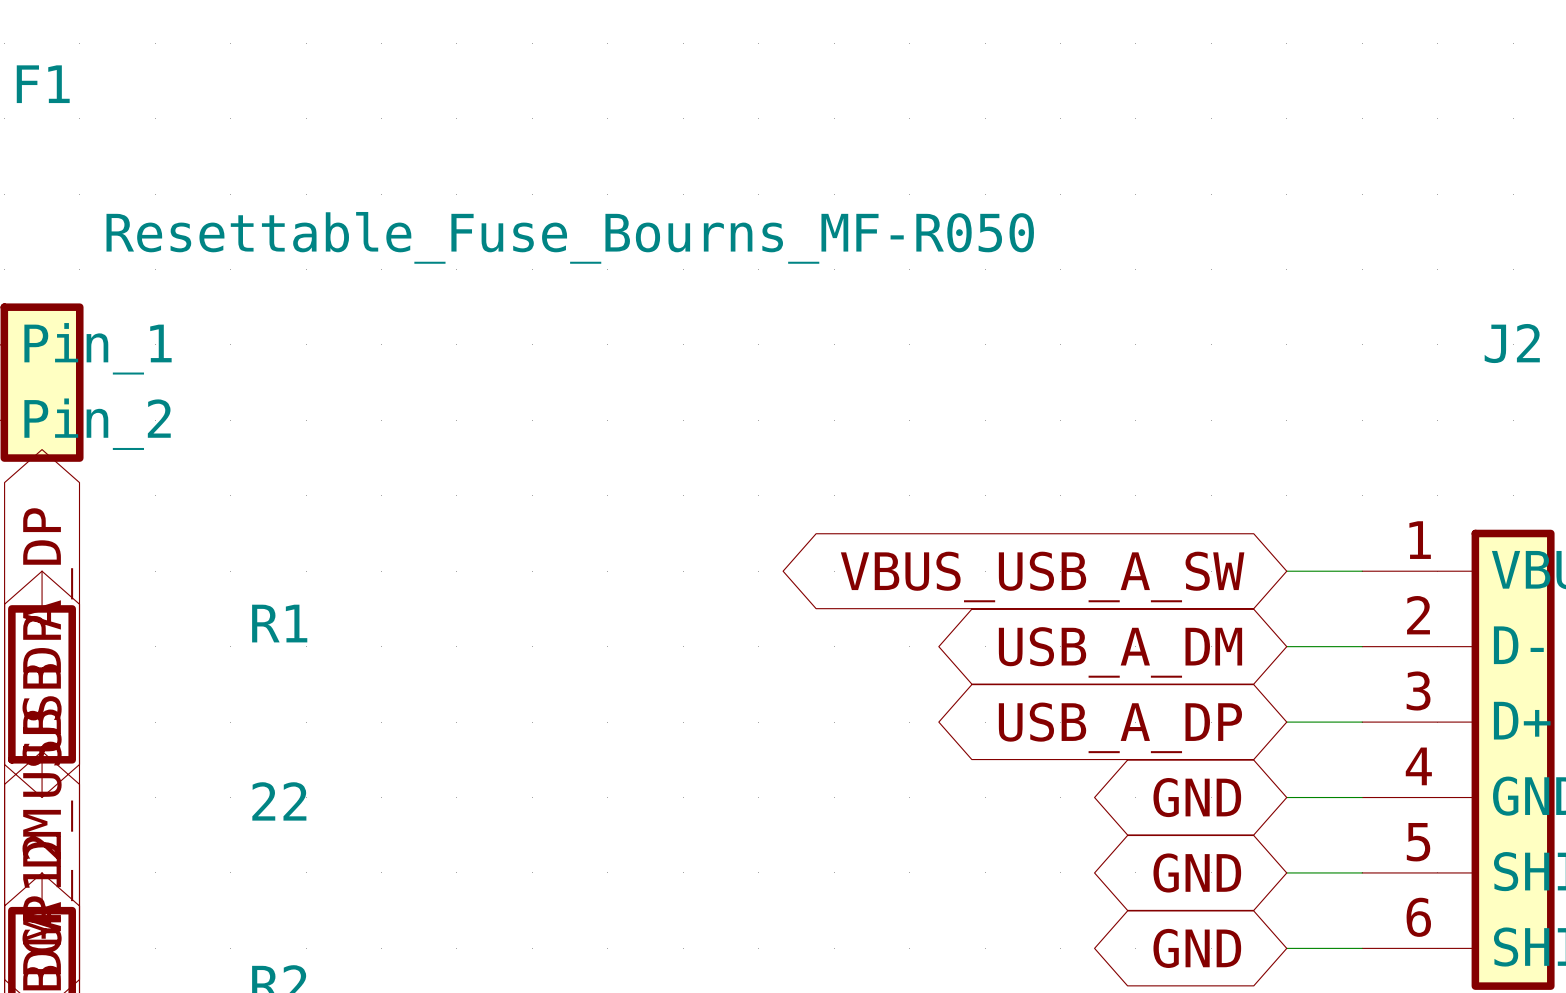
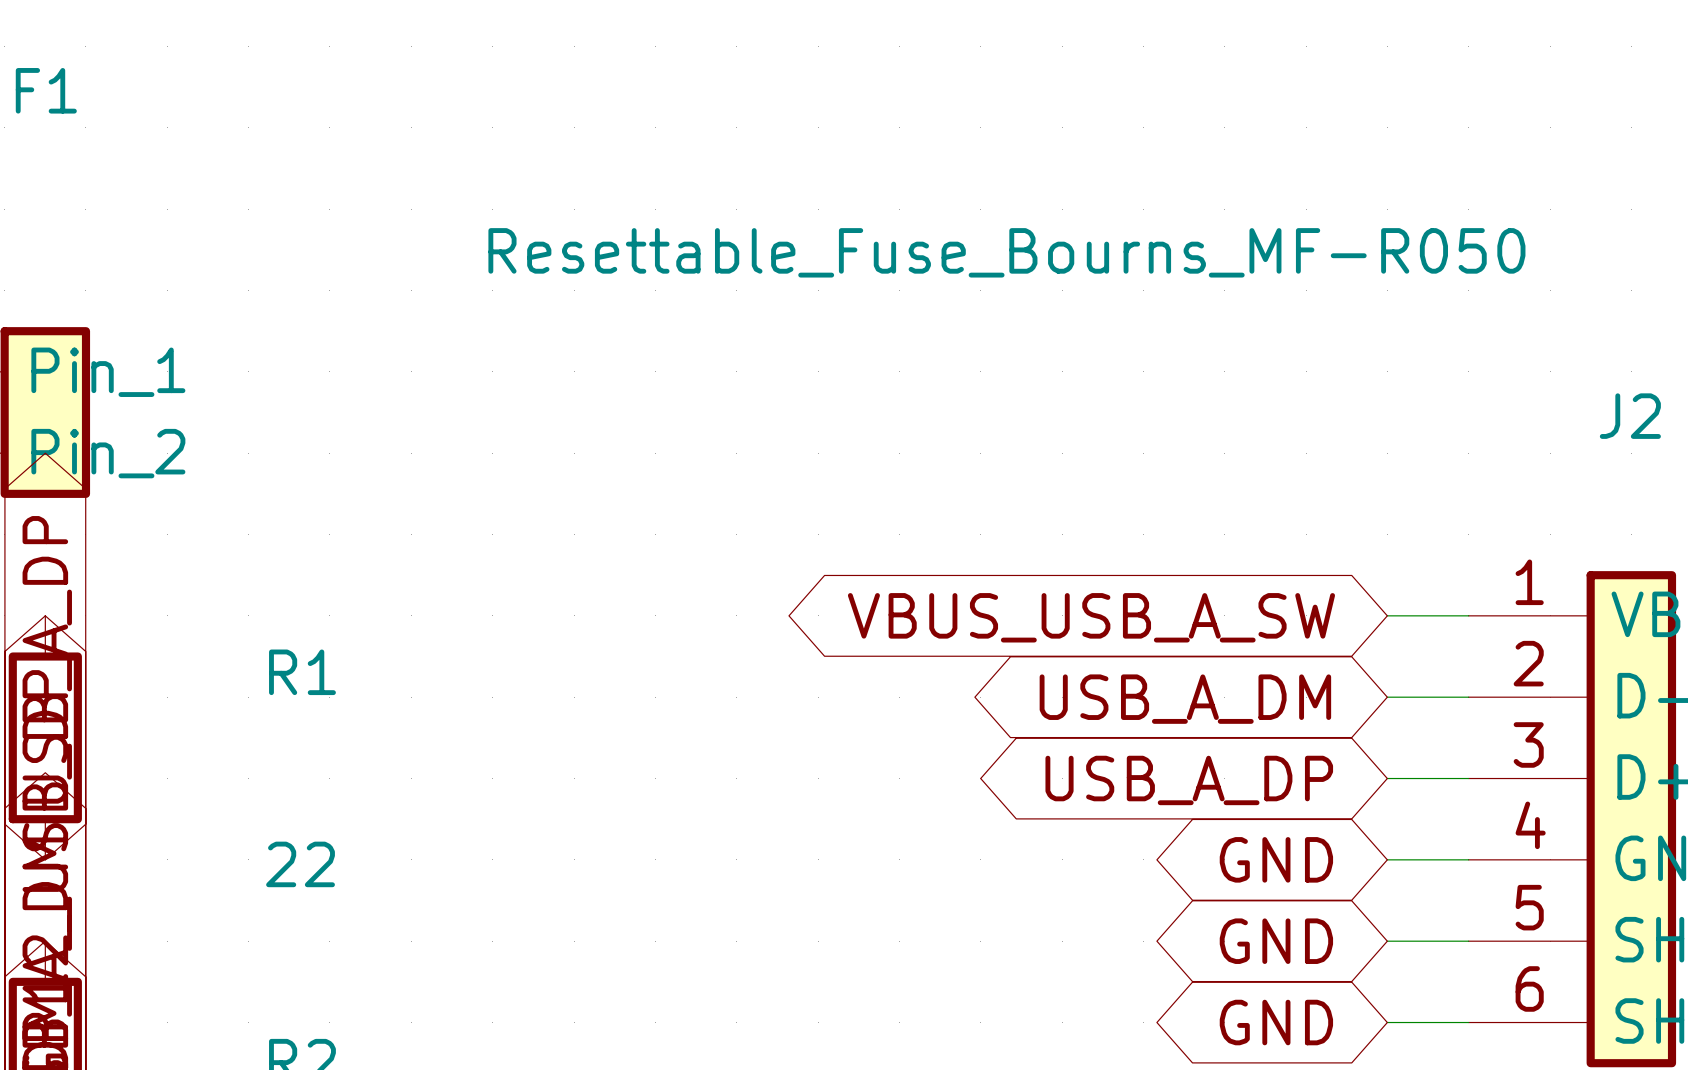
F1 value position: Resettable_Fuse_Bourns_MF-R050 (570, 237) -> Resettable_Fuse_Bourns_MF-R050 (1006, 252)
J2 name position: J2 (1512, 343) -> J2 (1630, 416)

